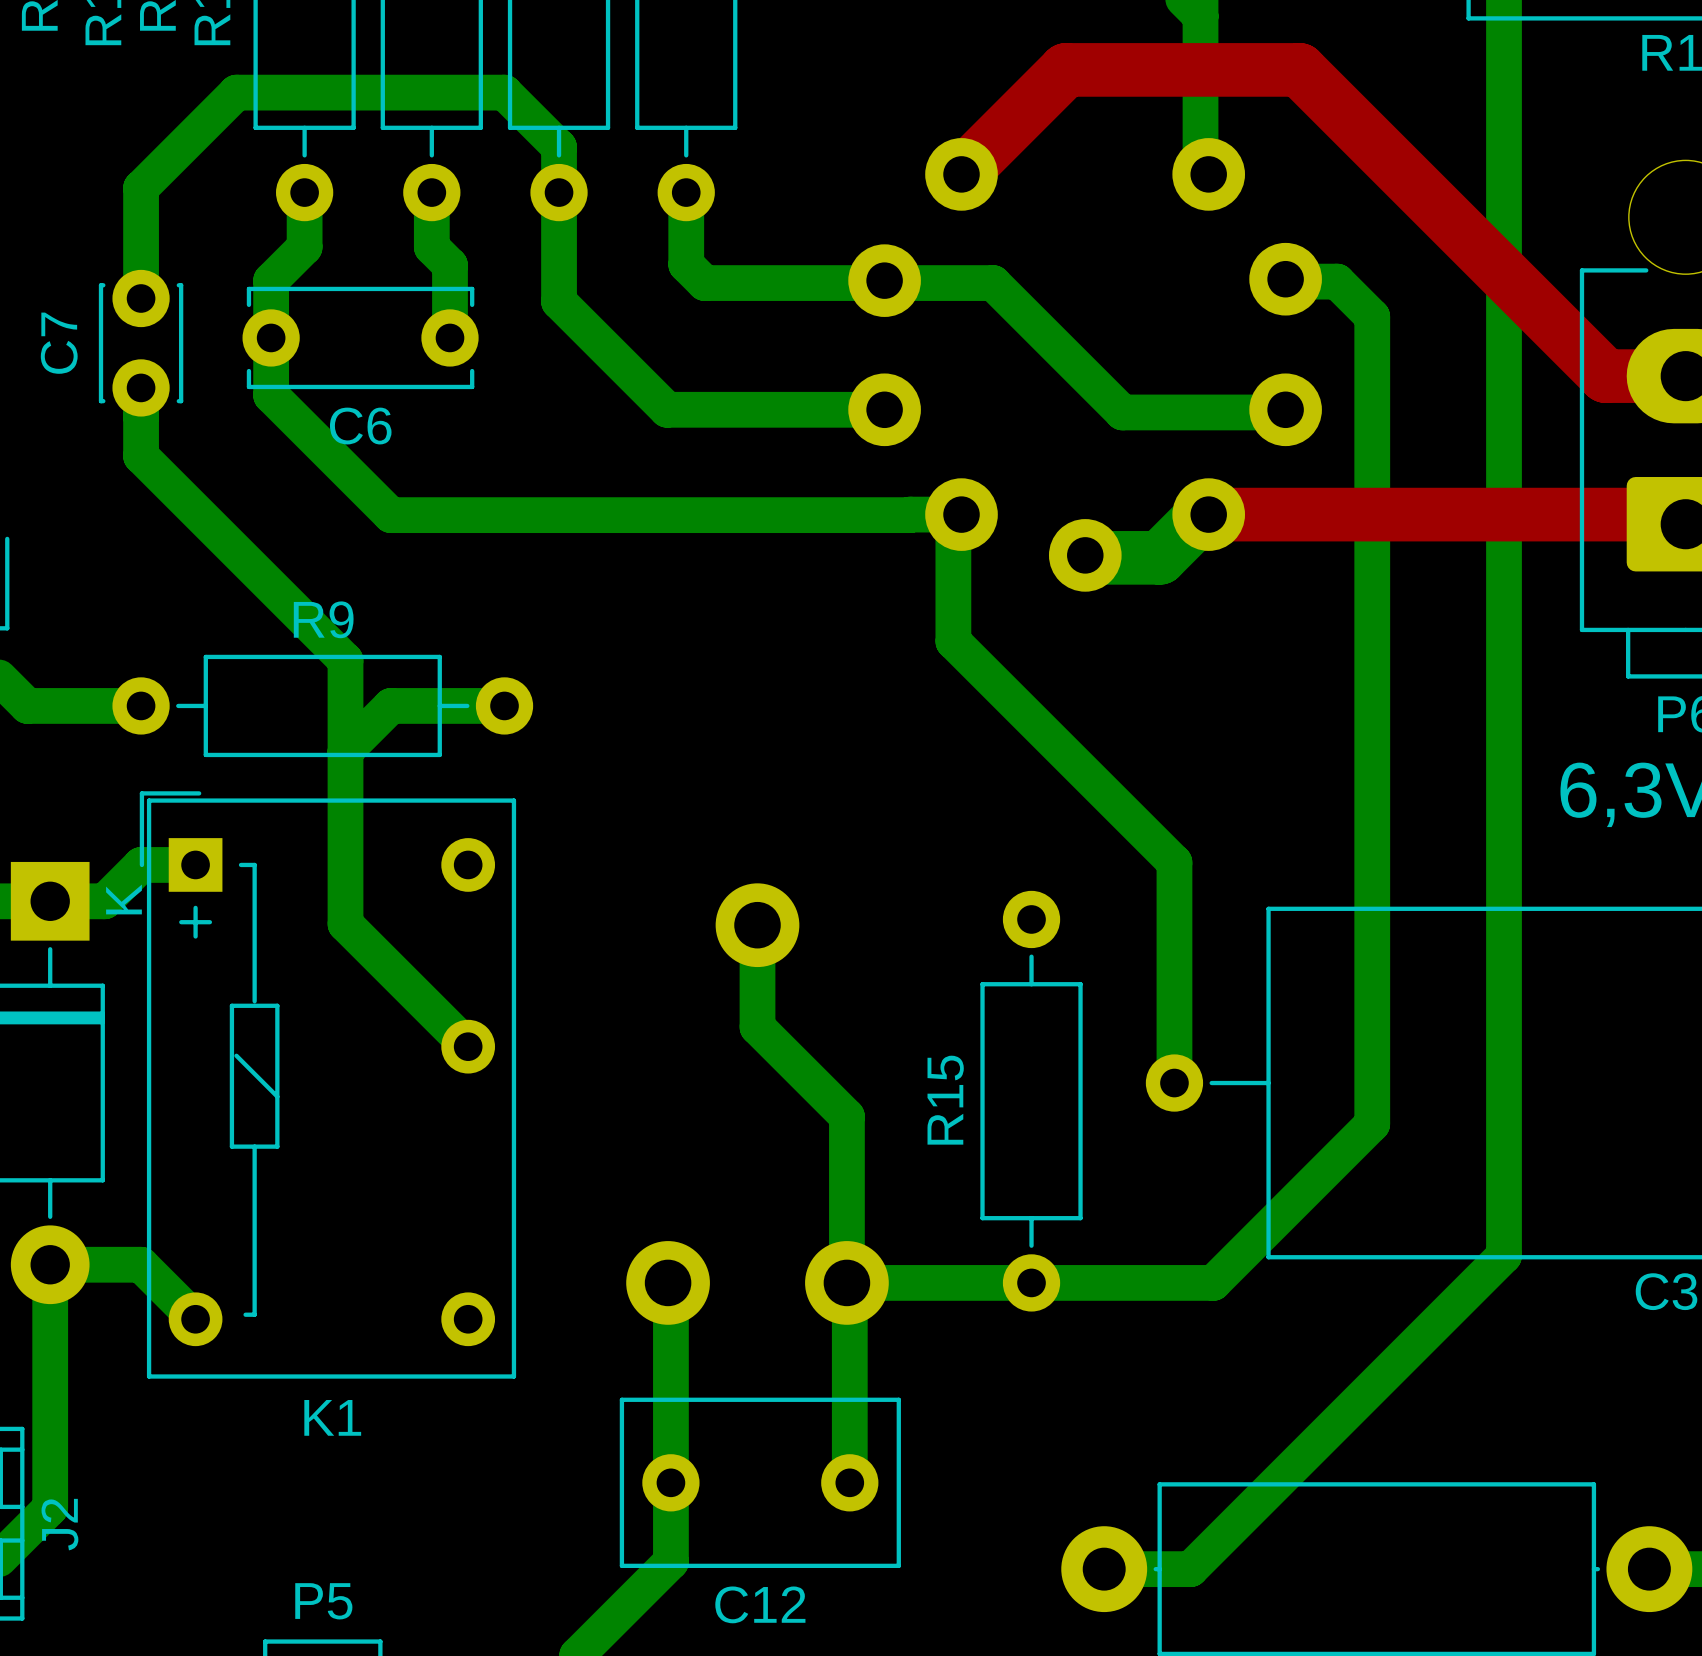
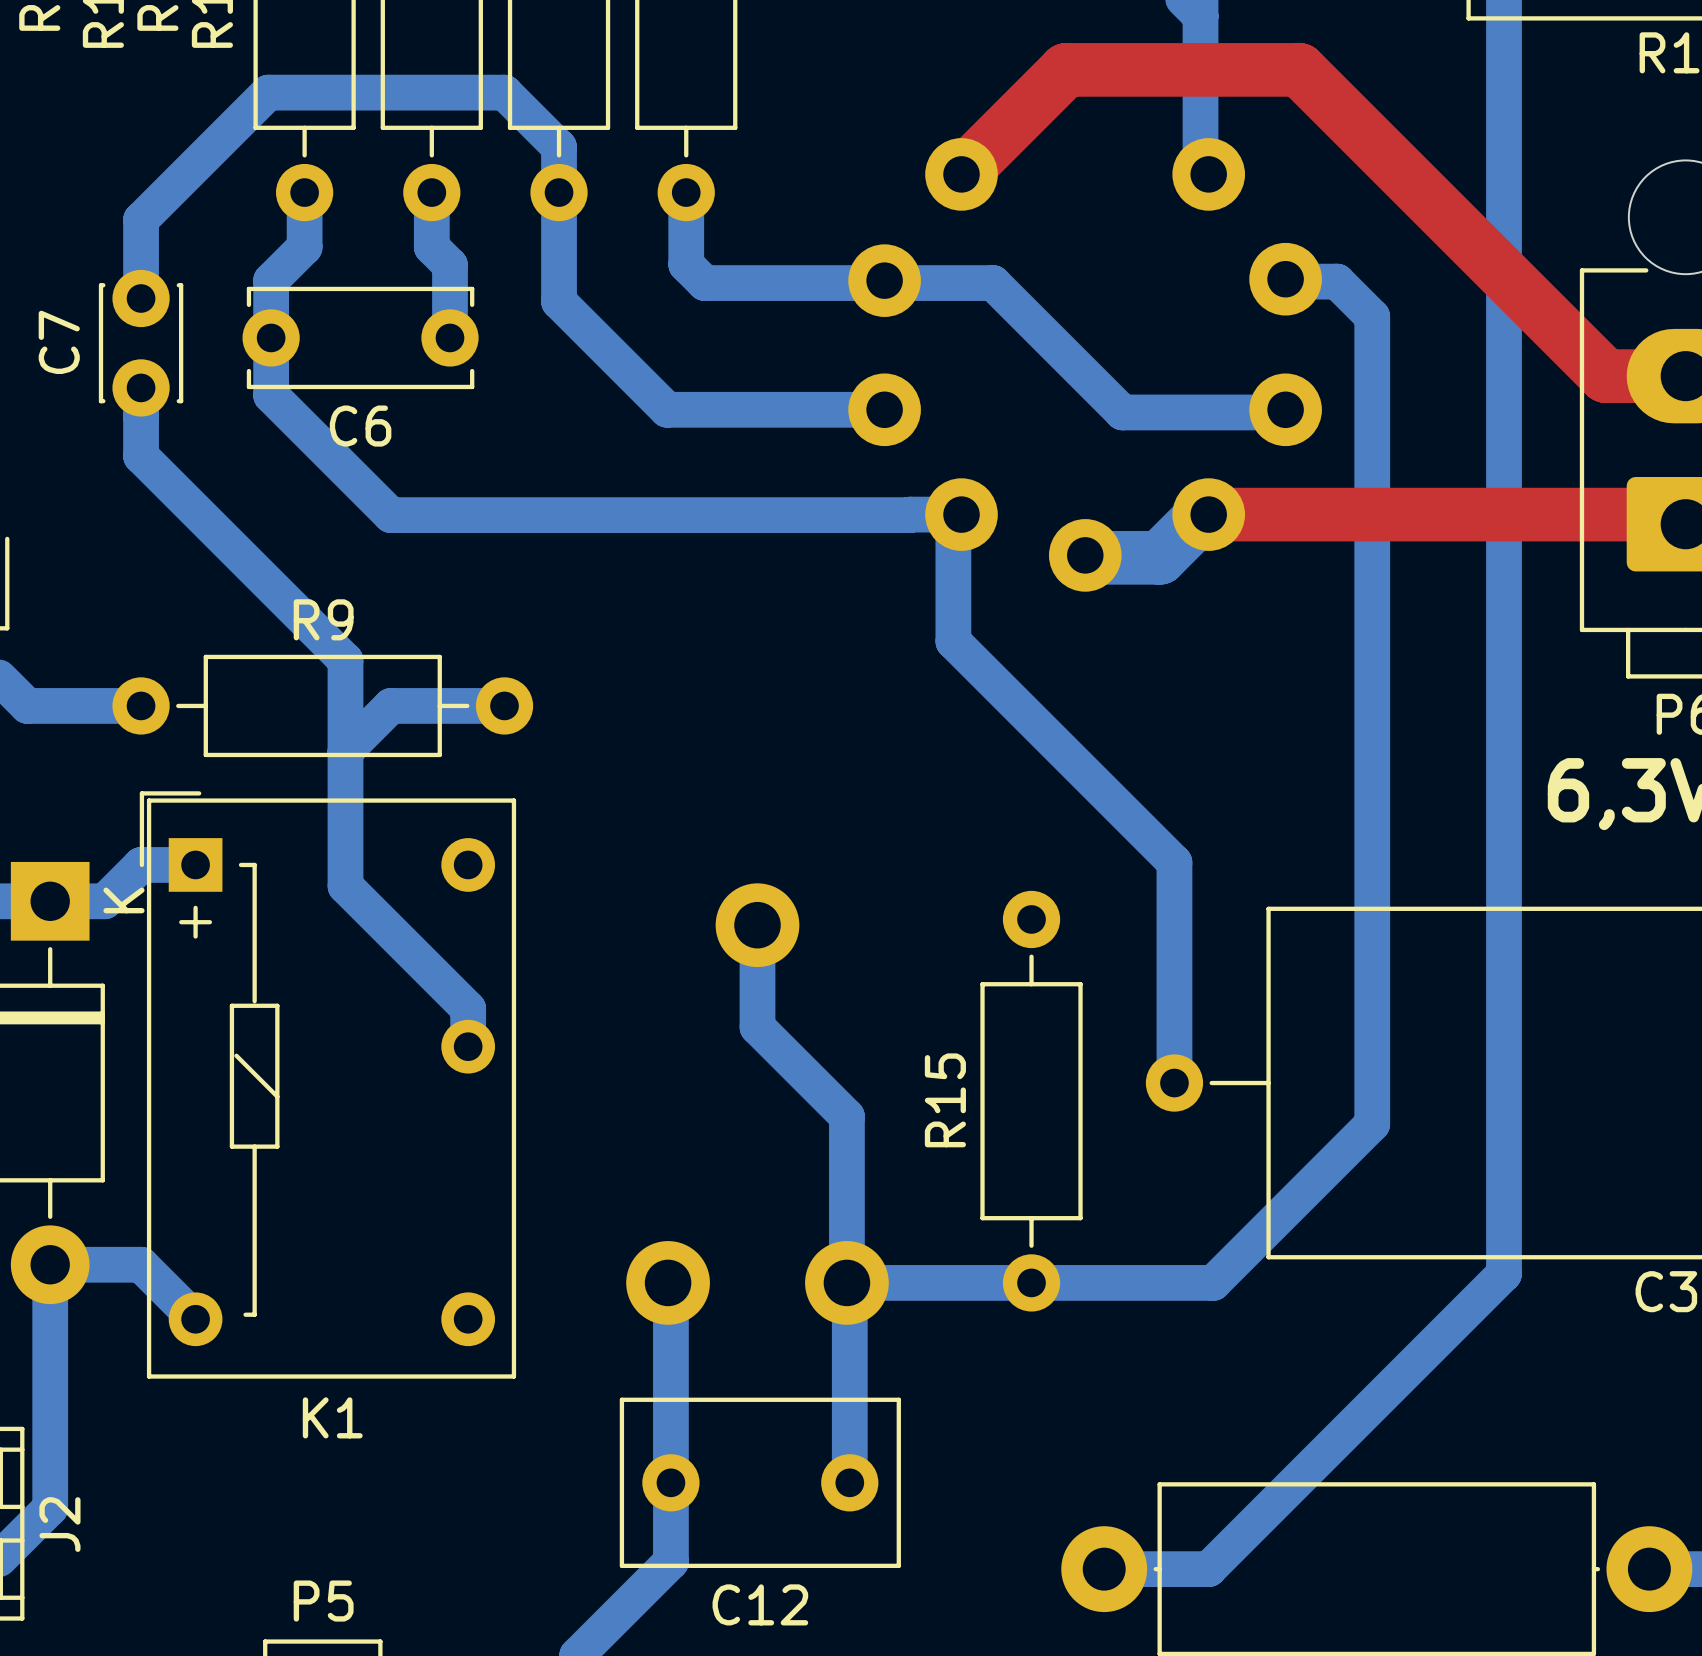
bottom track: (268, 92) (236, 92) (141, 188) (141, 219) -> (268, 92) (141, 219)
bottom track: (345, 886) (345, 924) (468, 1046) -> (345, 886) (468, 1008) (468, 1046)
bottom track: (1504, 1255) (1190, 1569) -> (1504, 1255) (1504, 1273) (1208, 1569) (1190, 1569)

